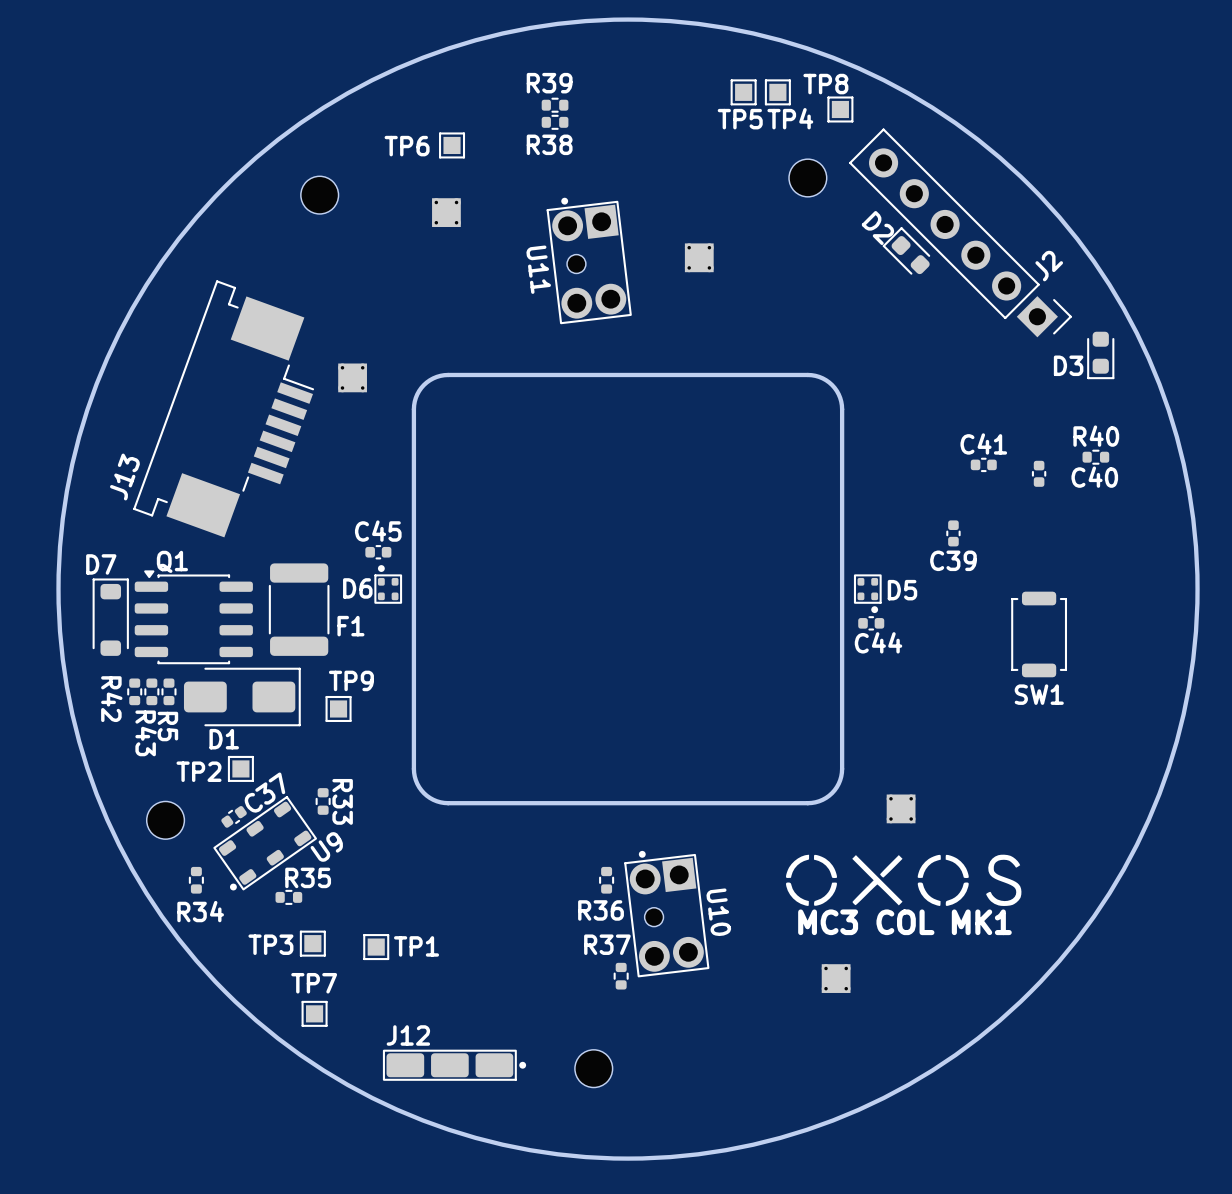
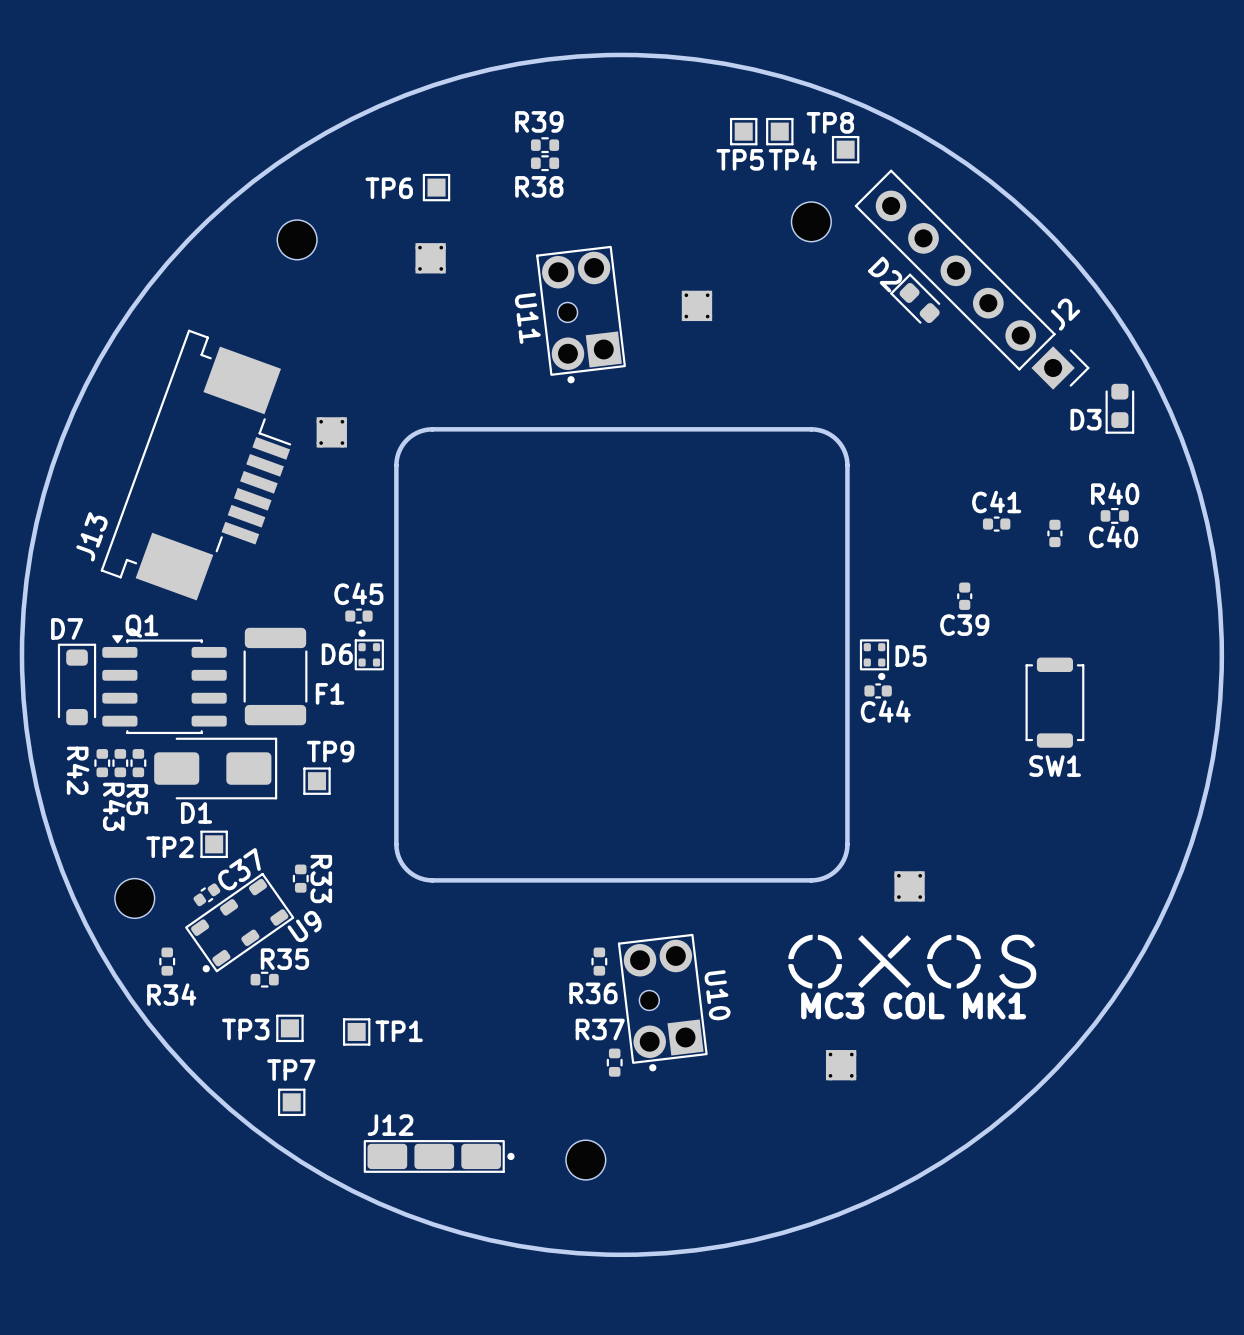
U11 footprint: [546, 197, 632, 325] -> [536, 245, 626, 384]
U10 footprint: [624, 850, 710, 978] -> [617, 933, 708, 1072]

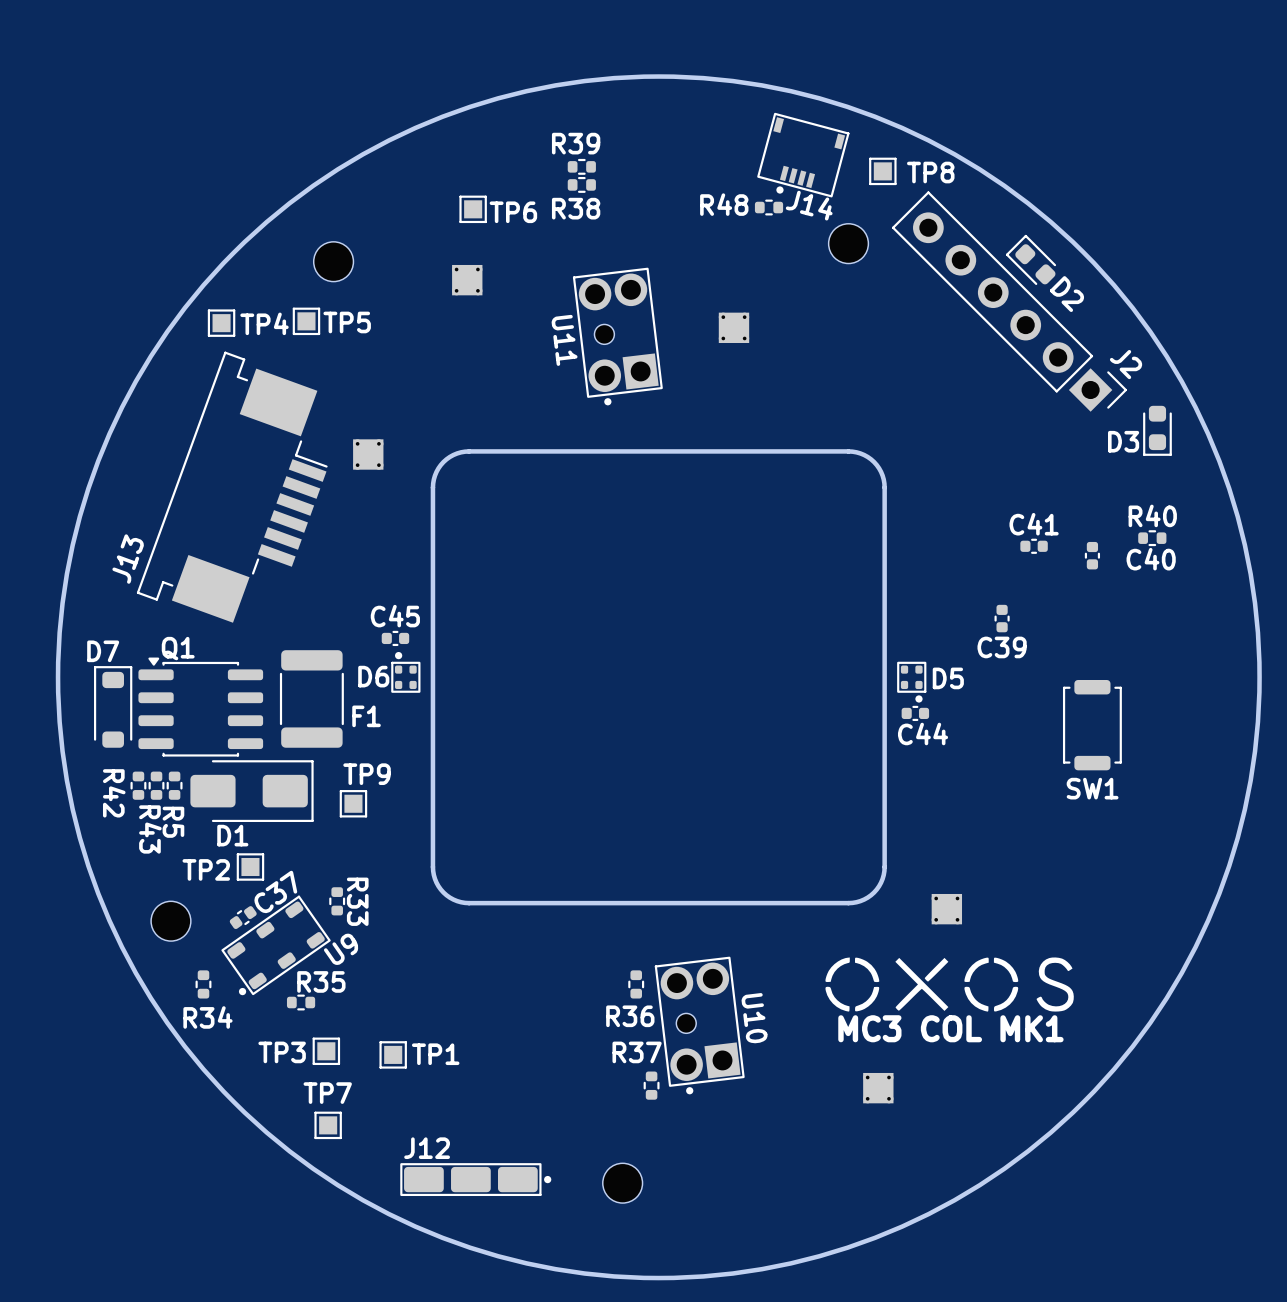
TP8 name position: TP8 (830, 122) -> TP8 (930, 172)
TP5 position: (743, 131) -> (306, 321)
TP4 position: (779, 131) -> (221, 323)
J14: none -> (803, 155)
TP5 name position: TP5 (740, 159) -> TP5 (347, 322)
TP4 name position: TP4 (792, 159) -> TP4 (264, 323)
R48: none -> (769, 207)
TP6 name position: TP6 (389, 188) -> TP6 (513, 212)
D2 name position: D2 (885, 274) -> D2 (1067, 294)
D2 position: (915, 298) -> (1031, 259)
J2 name rotation: 0° (1065, 314) -> 90° clockwise (1126, 364)

